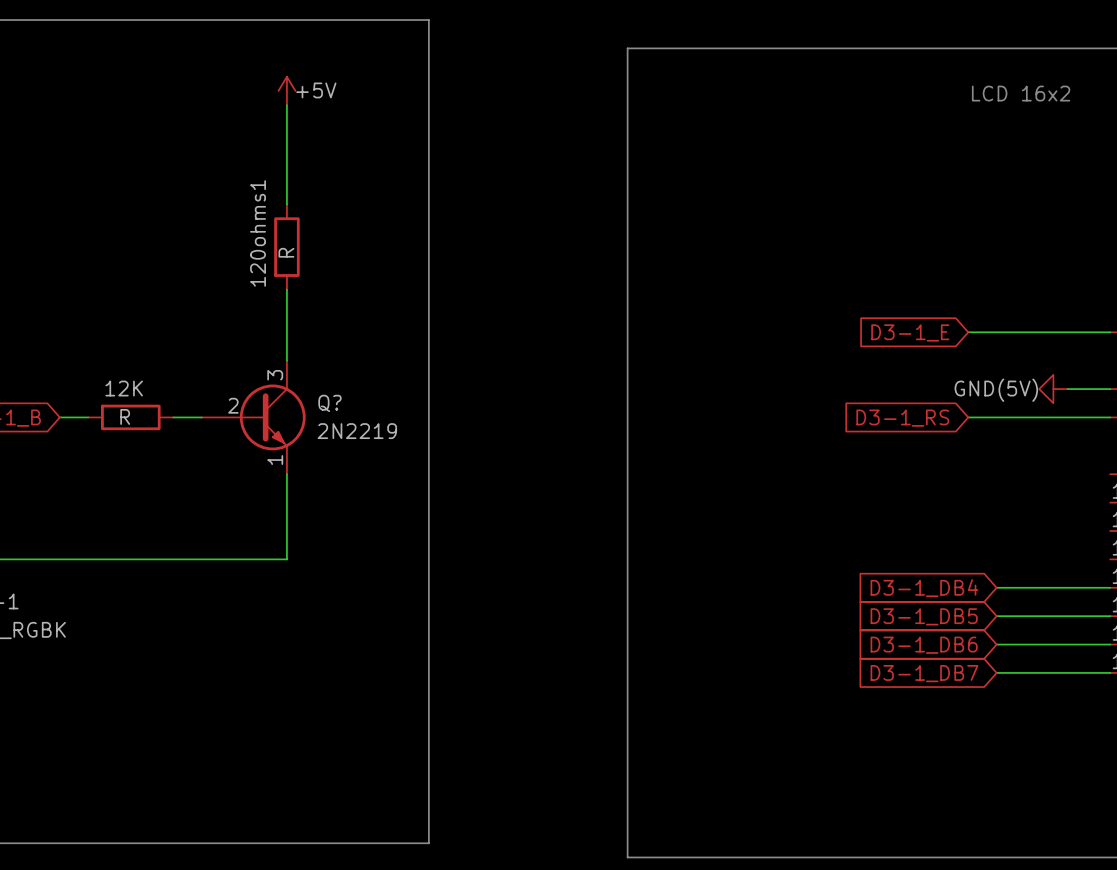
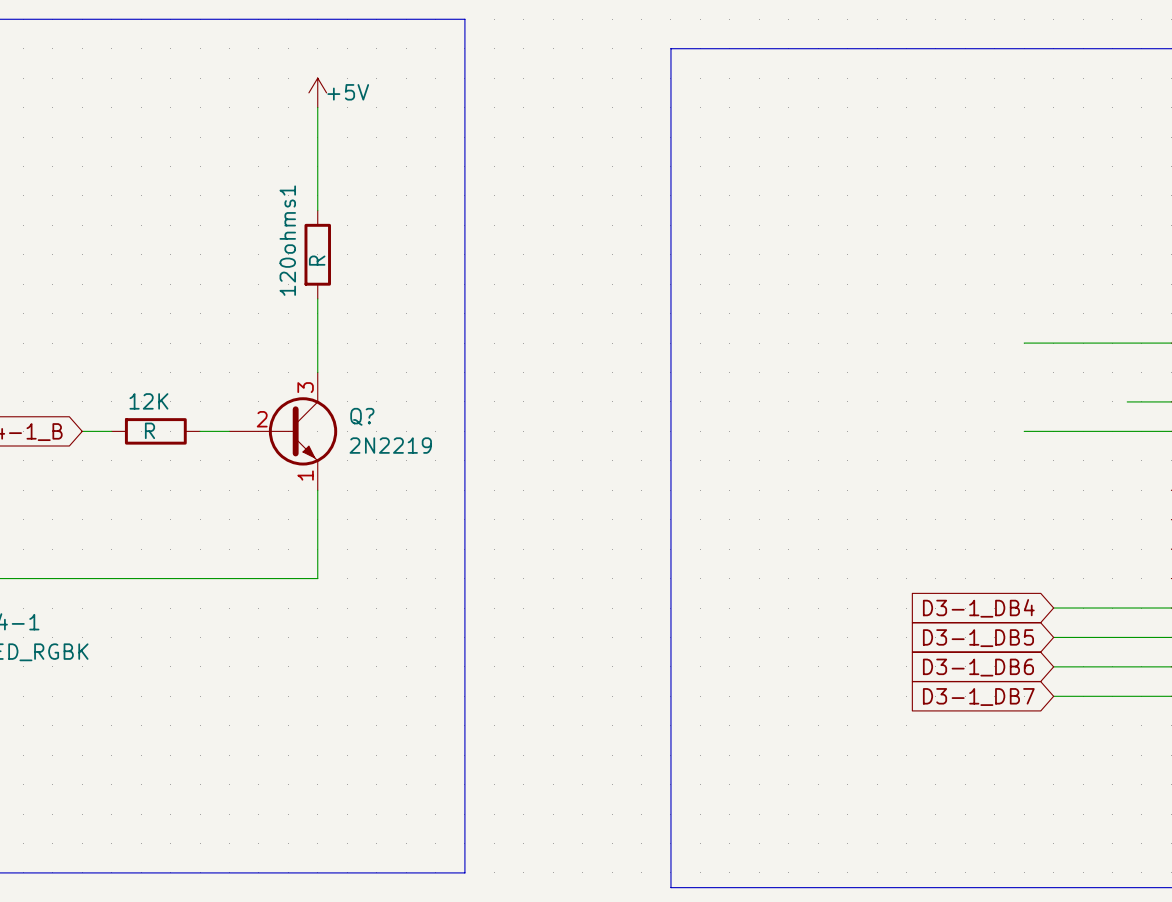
text: LCD 16x2 (1021, 93) -> none
global label: D3-1_E (910, 332) -> none
GND(5V): (1053, 389) -> none
global label: D3-1_RS (902, 418) -> none

